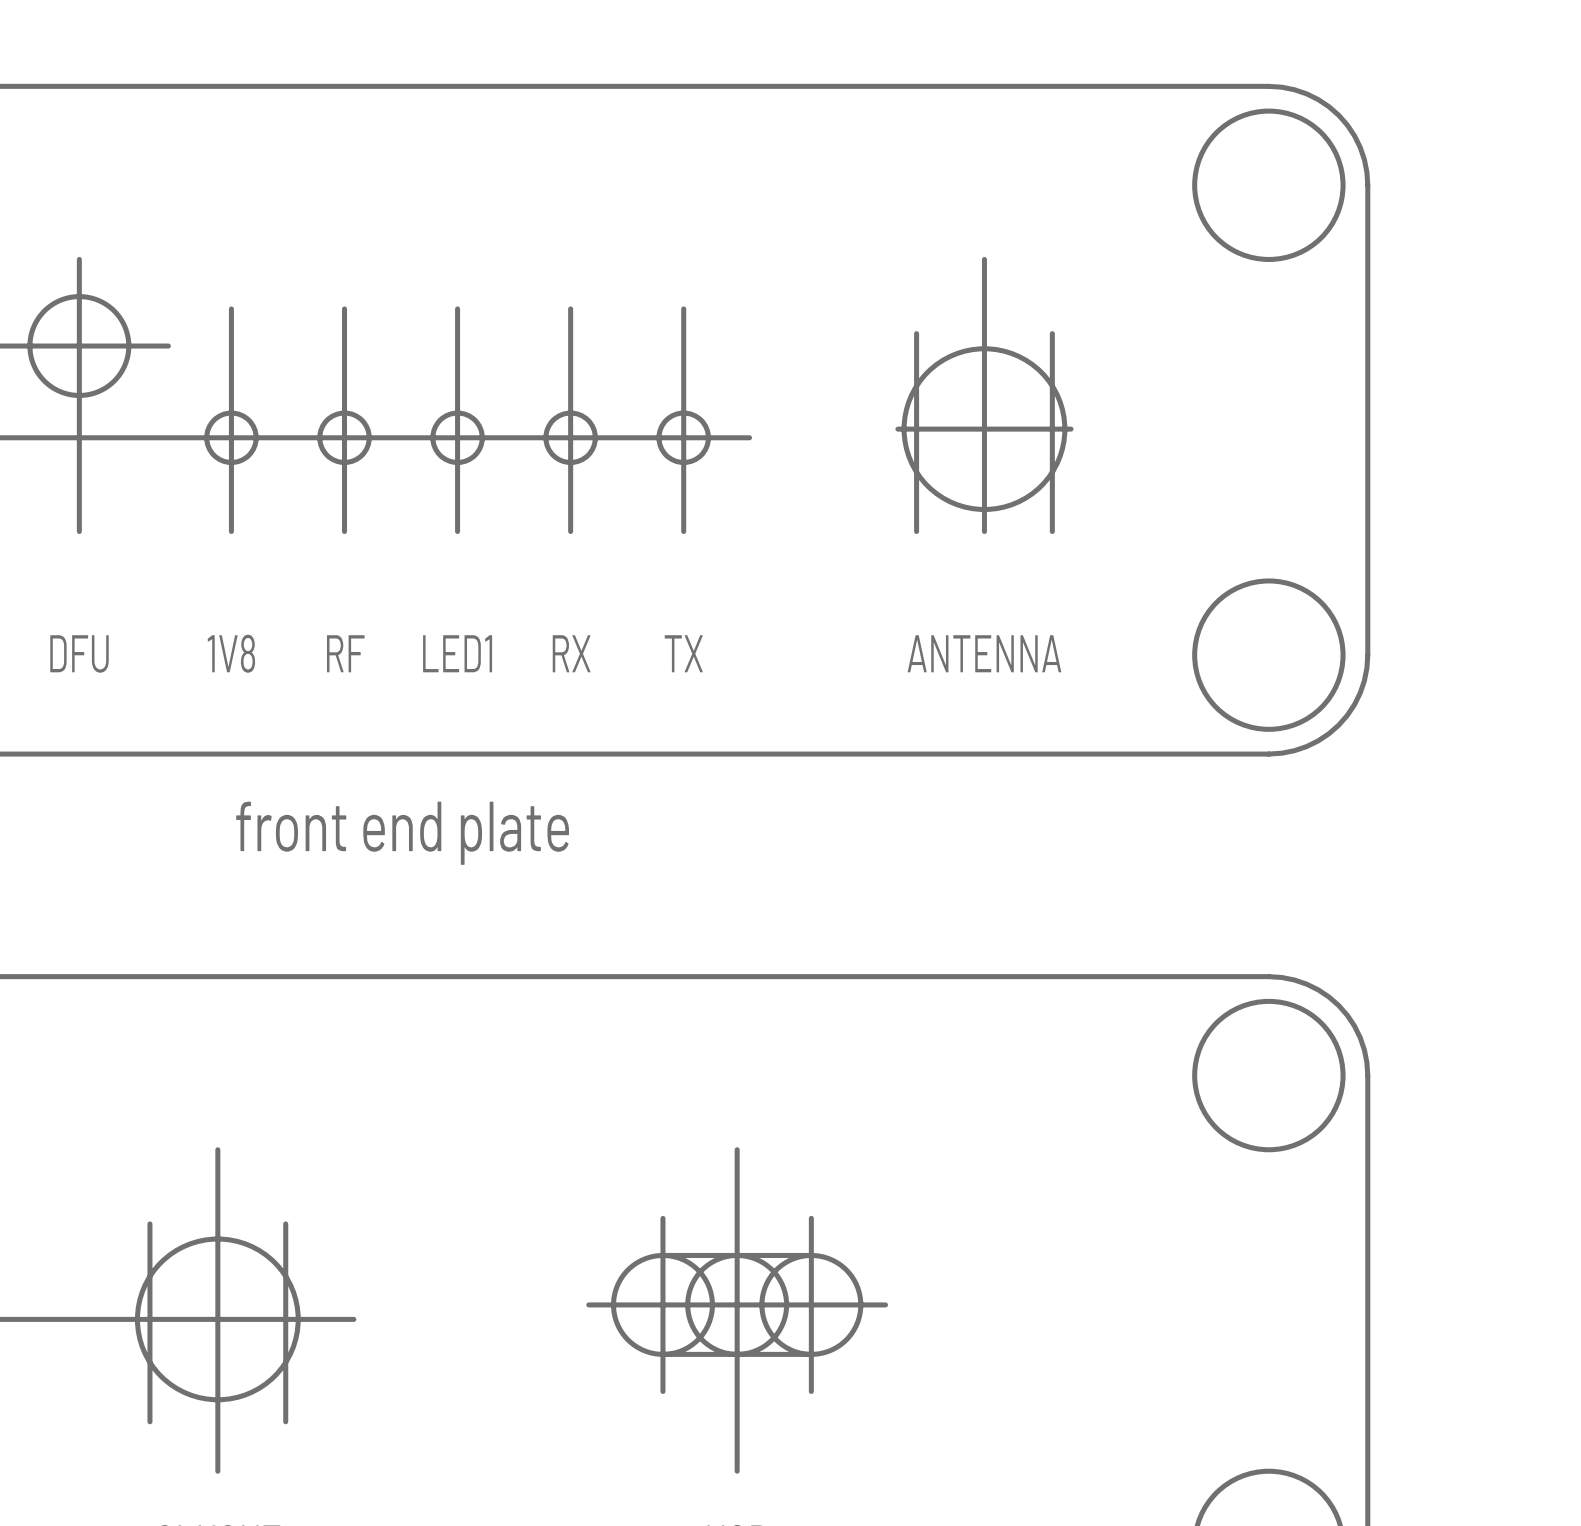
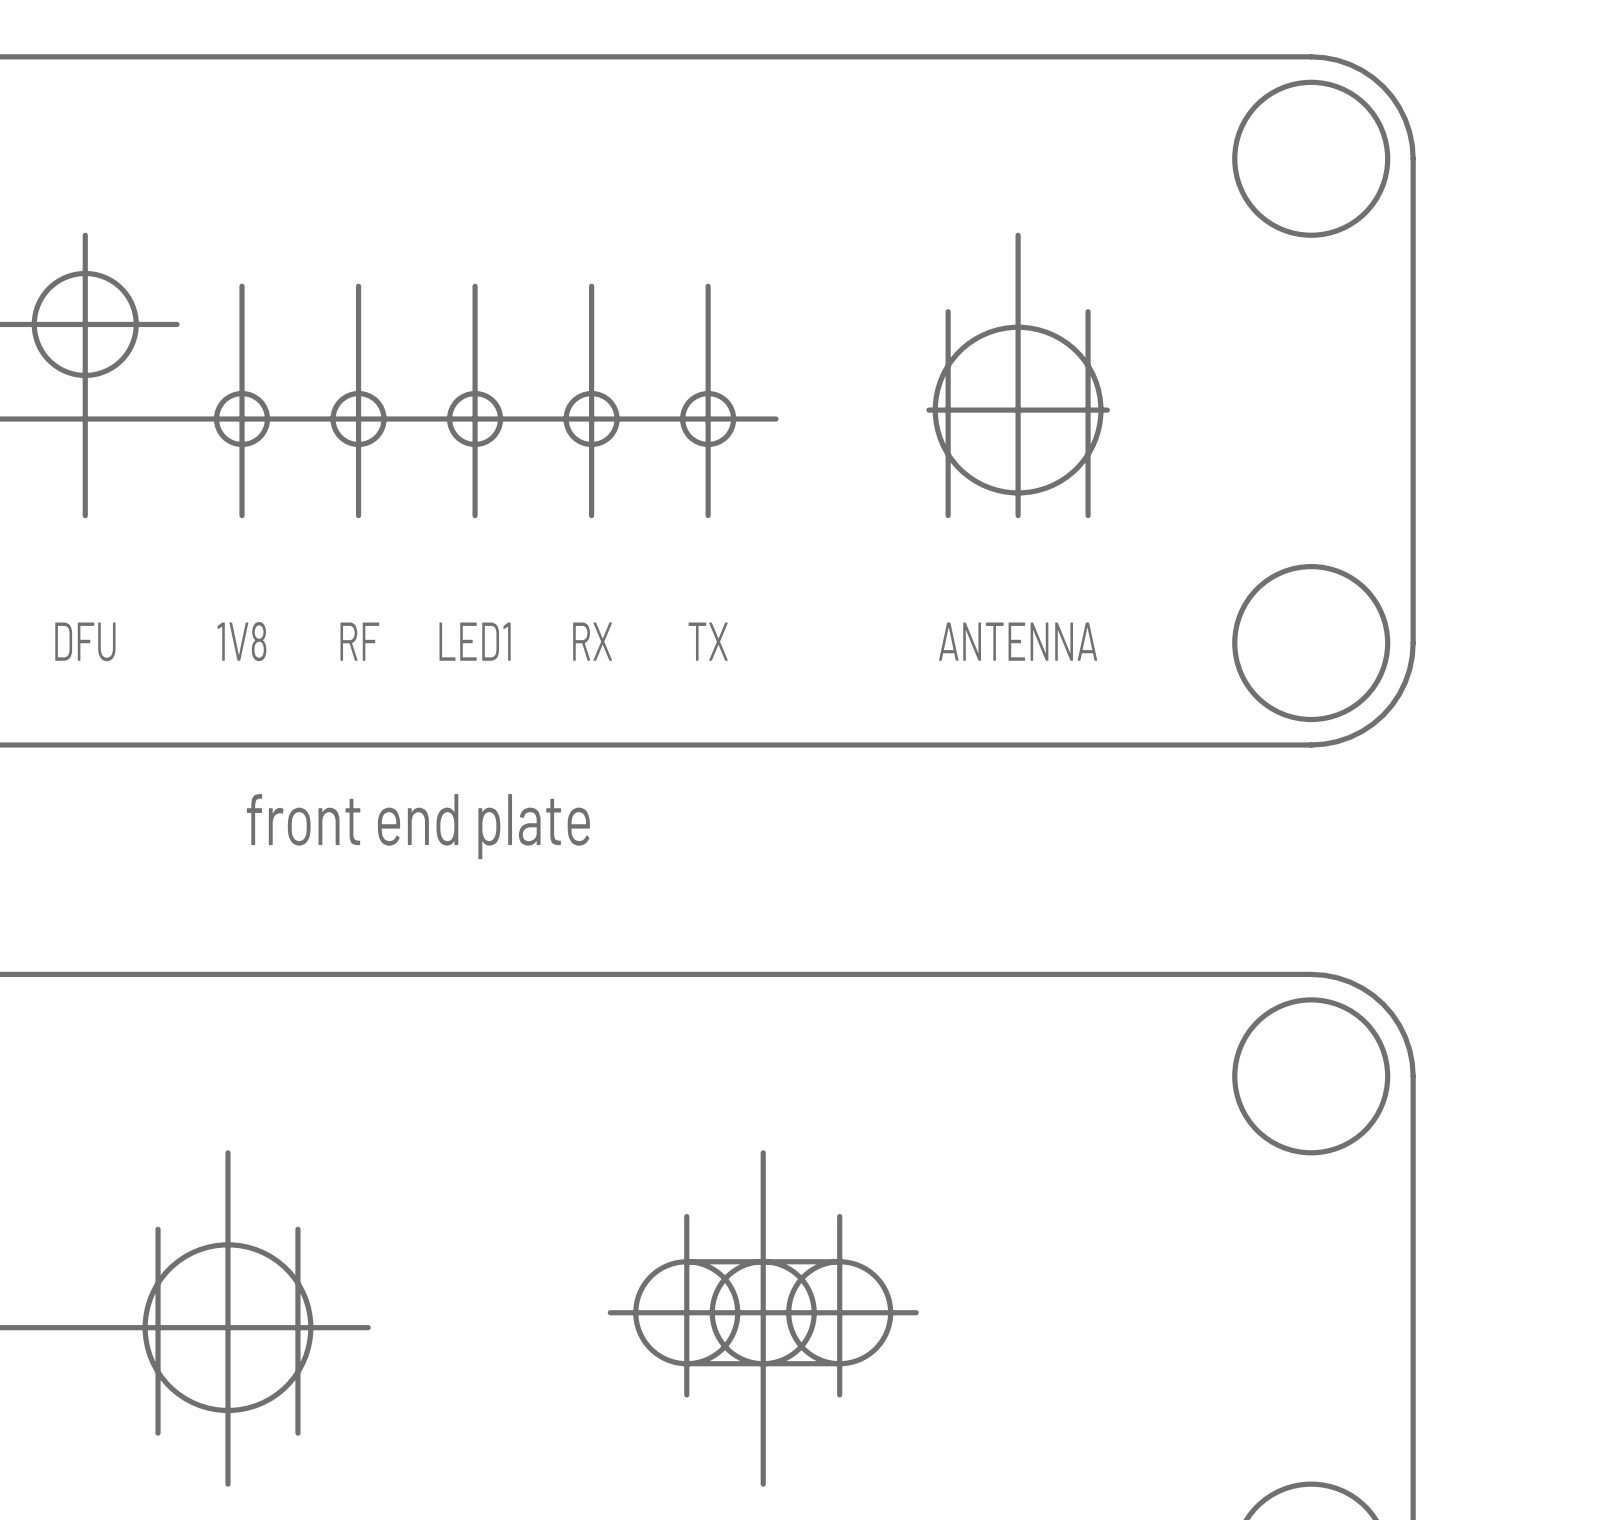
line: (662, 1384) (662, 1391) -> (686, 1216) (686, 1223)
line: (811, 1384) (811, 1391) -> (839, 1216) (839, 1223)

